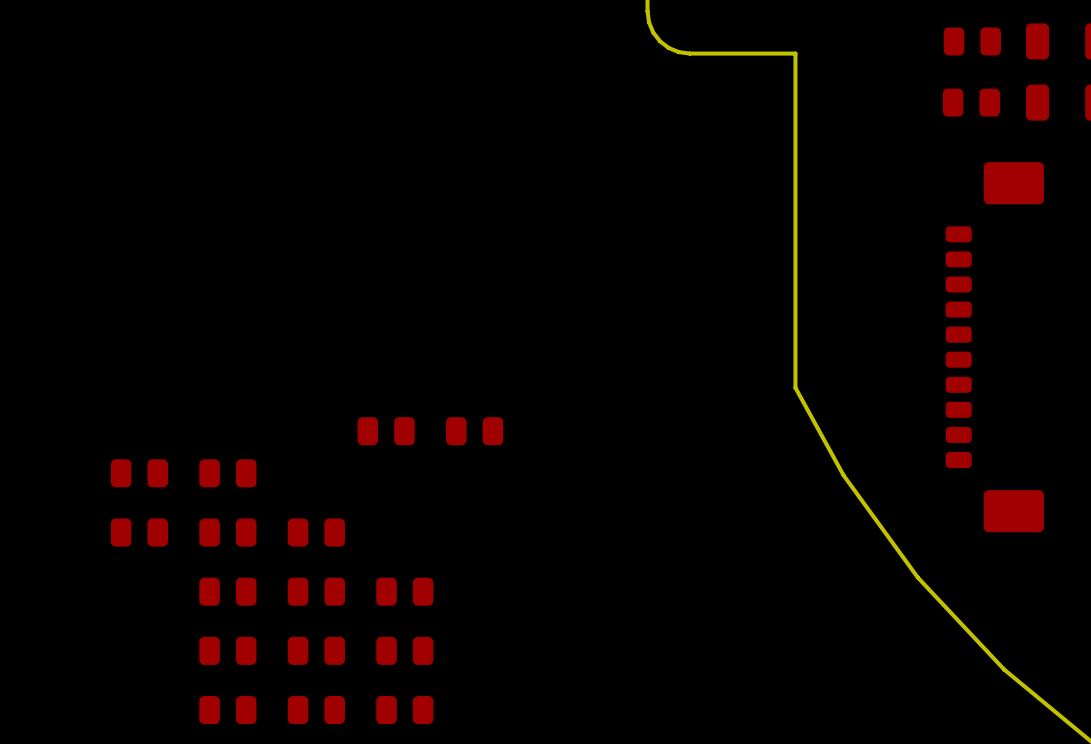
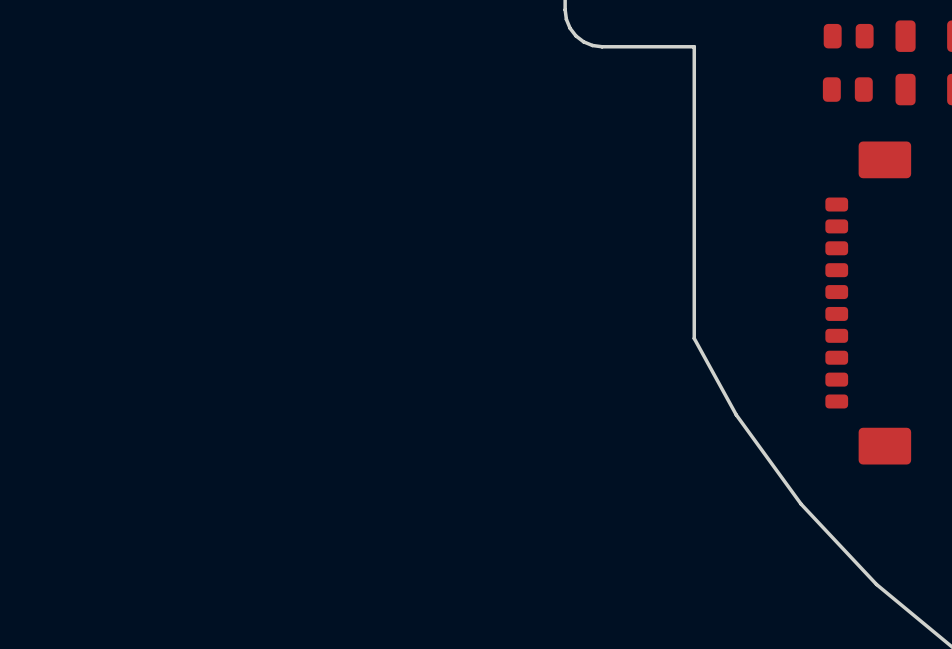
part: (386, 431) -> none
part: (474, 431) -> none
part: (139, 473) -> none
part: (227, 473) -> none
part: (139, 532) -> none
part: (227, 532) -> none
part: (316, 532) -> none
part: (227, 591) -> none
part: (316, 591) -> none
part: (404, 591) -> none
part: (227, 650) -> none
part: (316, 650) -> none
part: (404, 650) -> none
part: (227, 710) -> none
part: (316, 710) -> none
part: (404, 710) -> none

